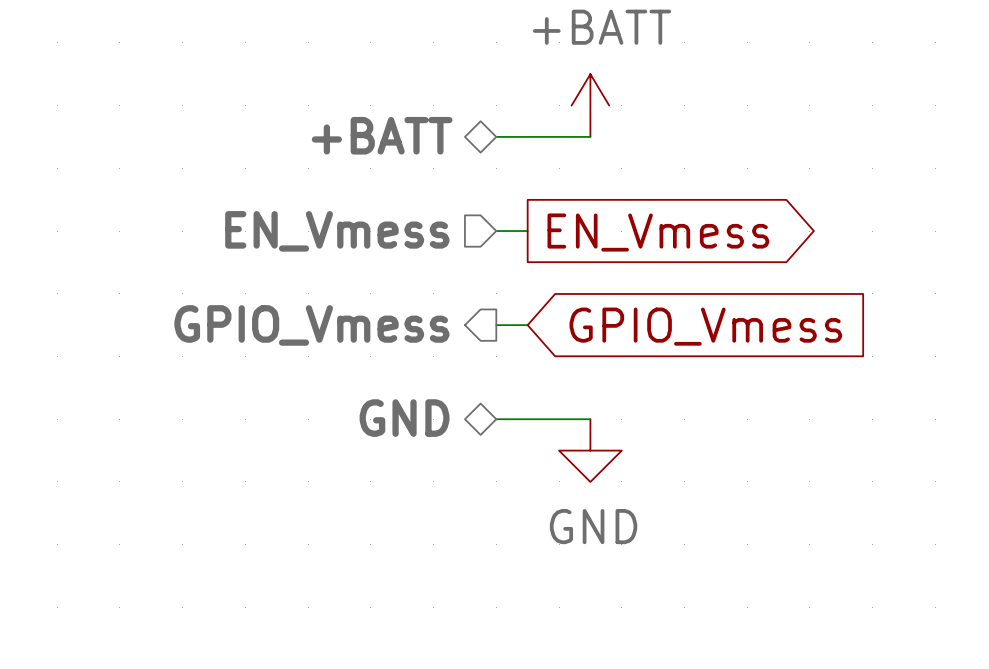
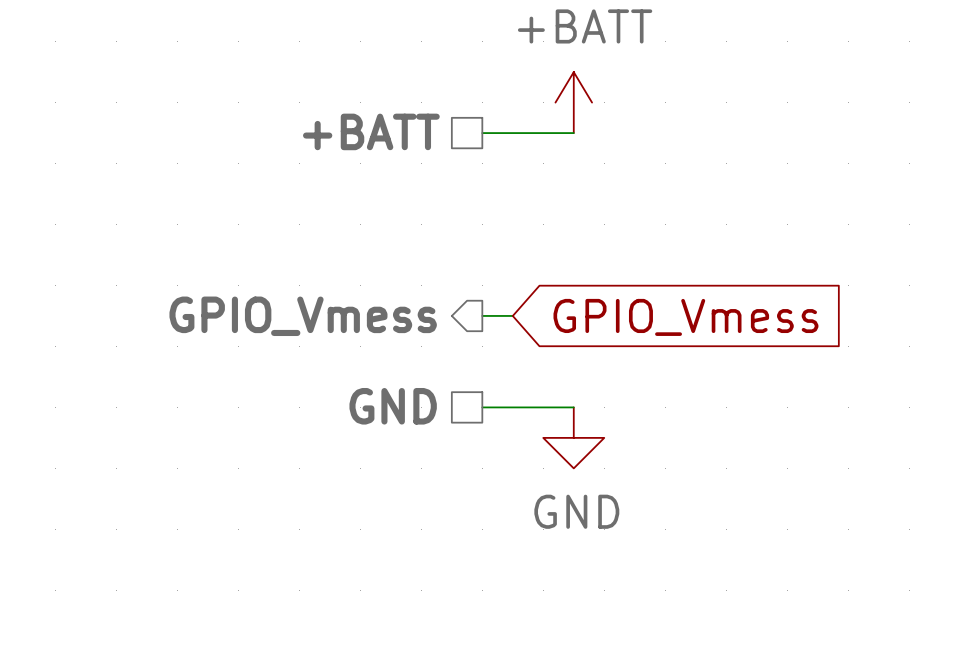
hierarchical label shape: bidirectional (382, 135) -> passive (371, 131)
hierarchical label: EN_Vmess (337, 231) -> none
wire: (496, 231) (527, 231) -> none
global label: EN_Vmess (658, 232) -> none
hierarchical label shape: bidirectional (404, 418) -> passive (393, 406)

